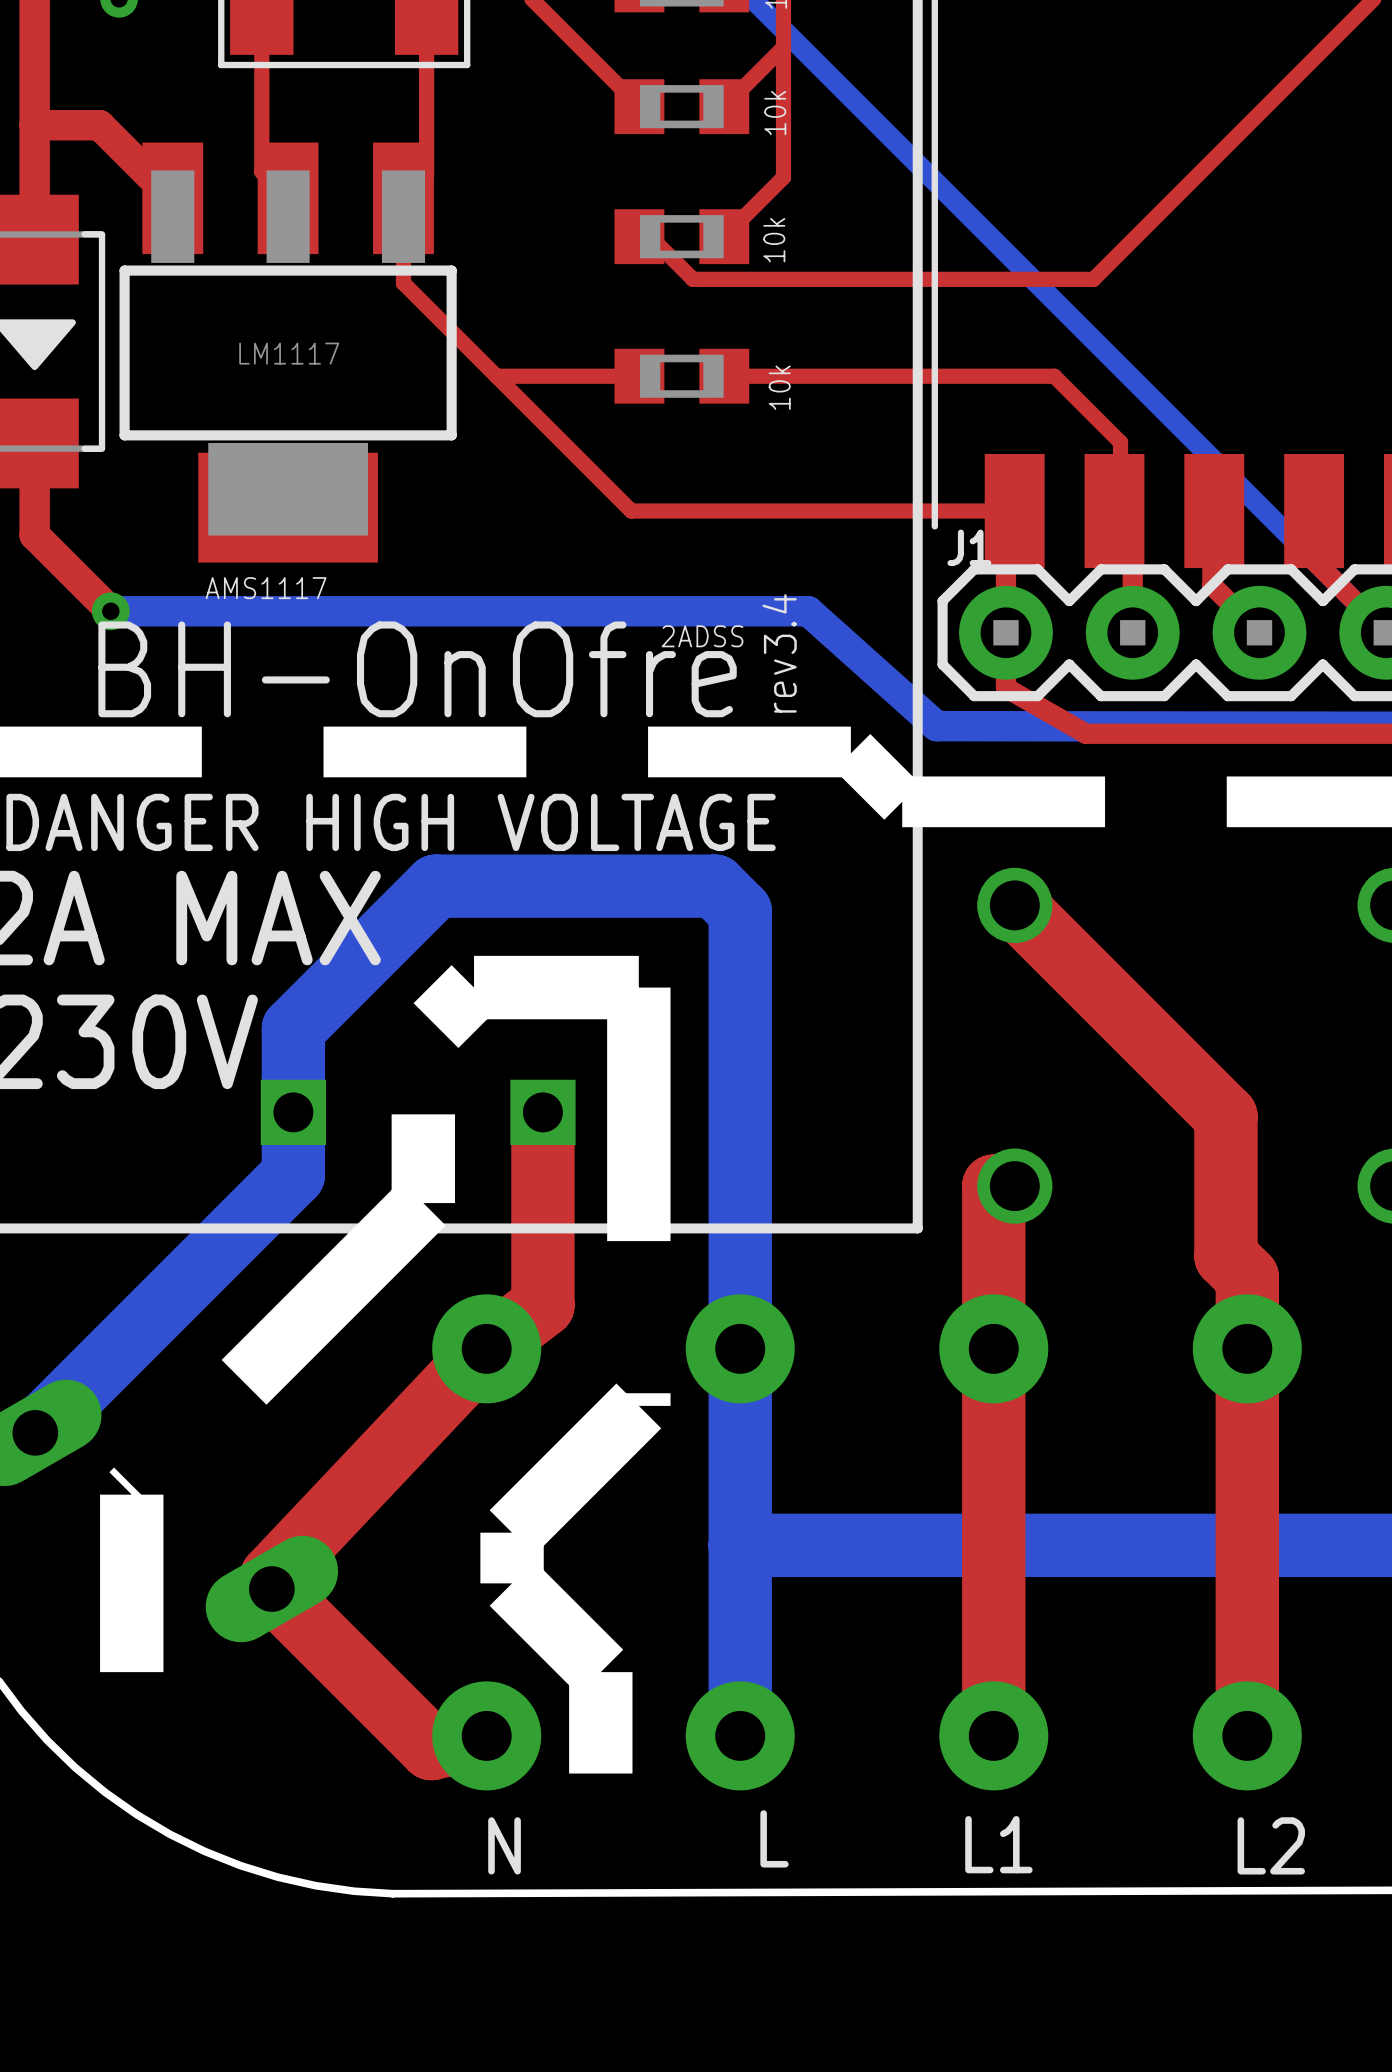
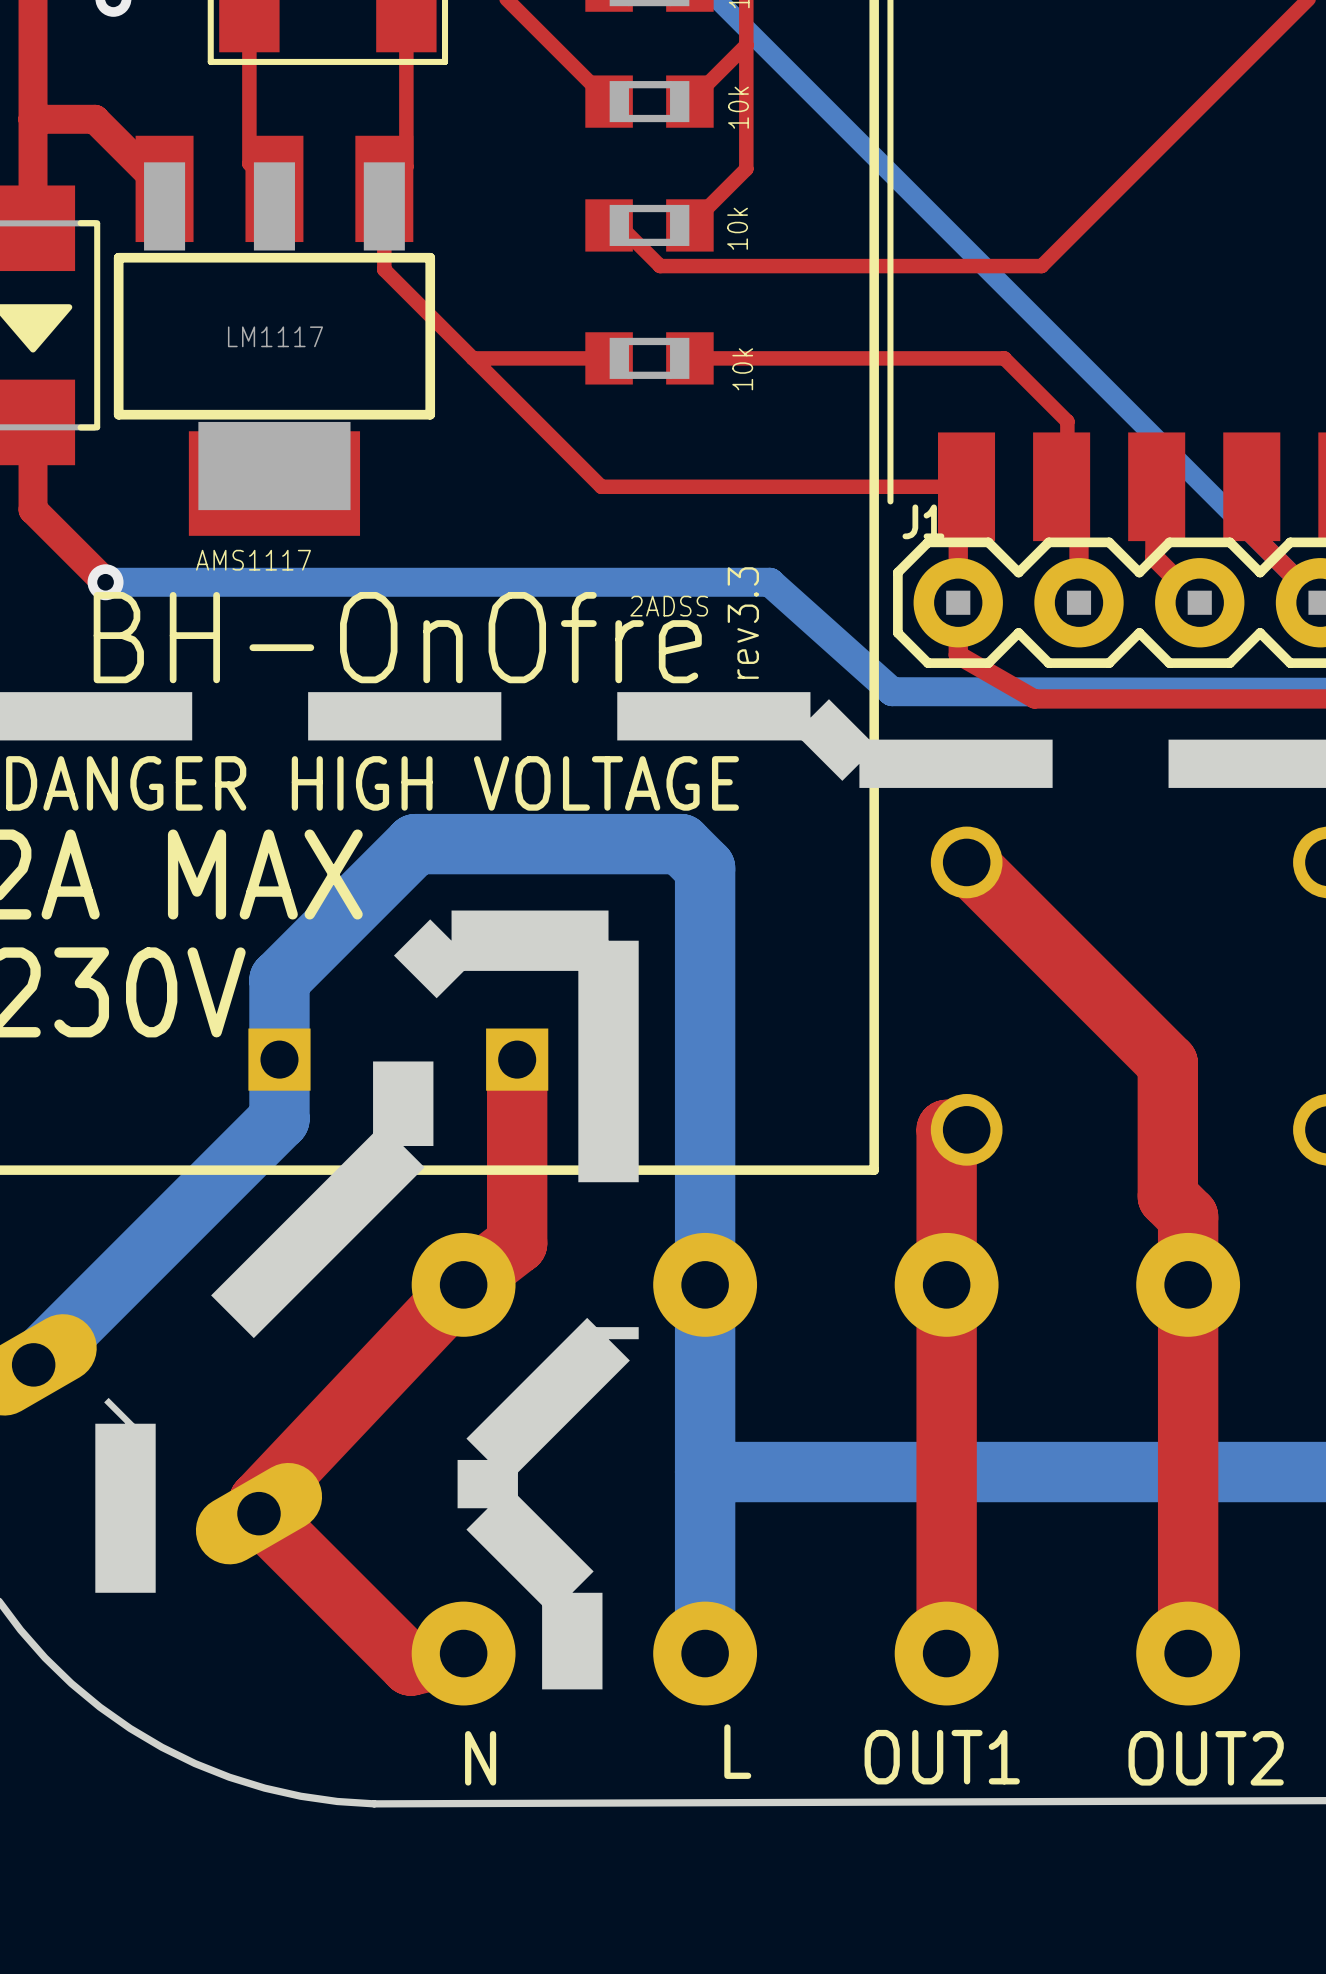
text: rev3.4 (779, 653) -> rev3.3 (743, 623)
text: L1 (998, 1844) -> OUT1 (942, 1757)
text: none -> OUT2 (1206, 1758)
text: L2 (1271, 1845) -> none

